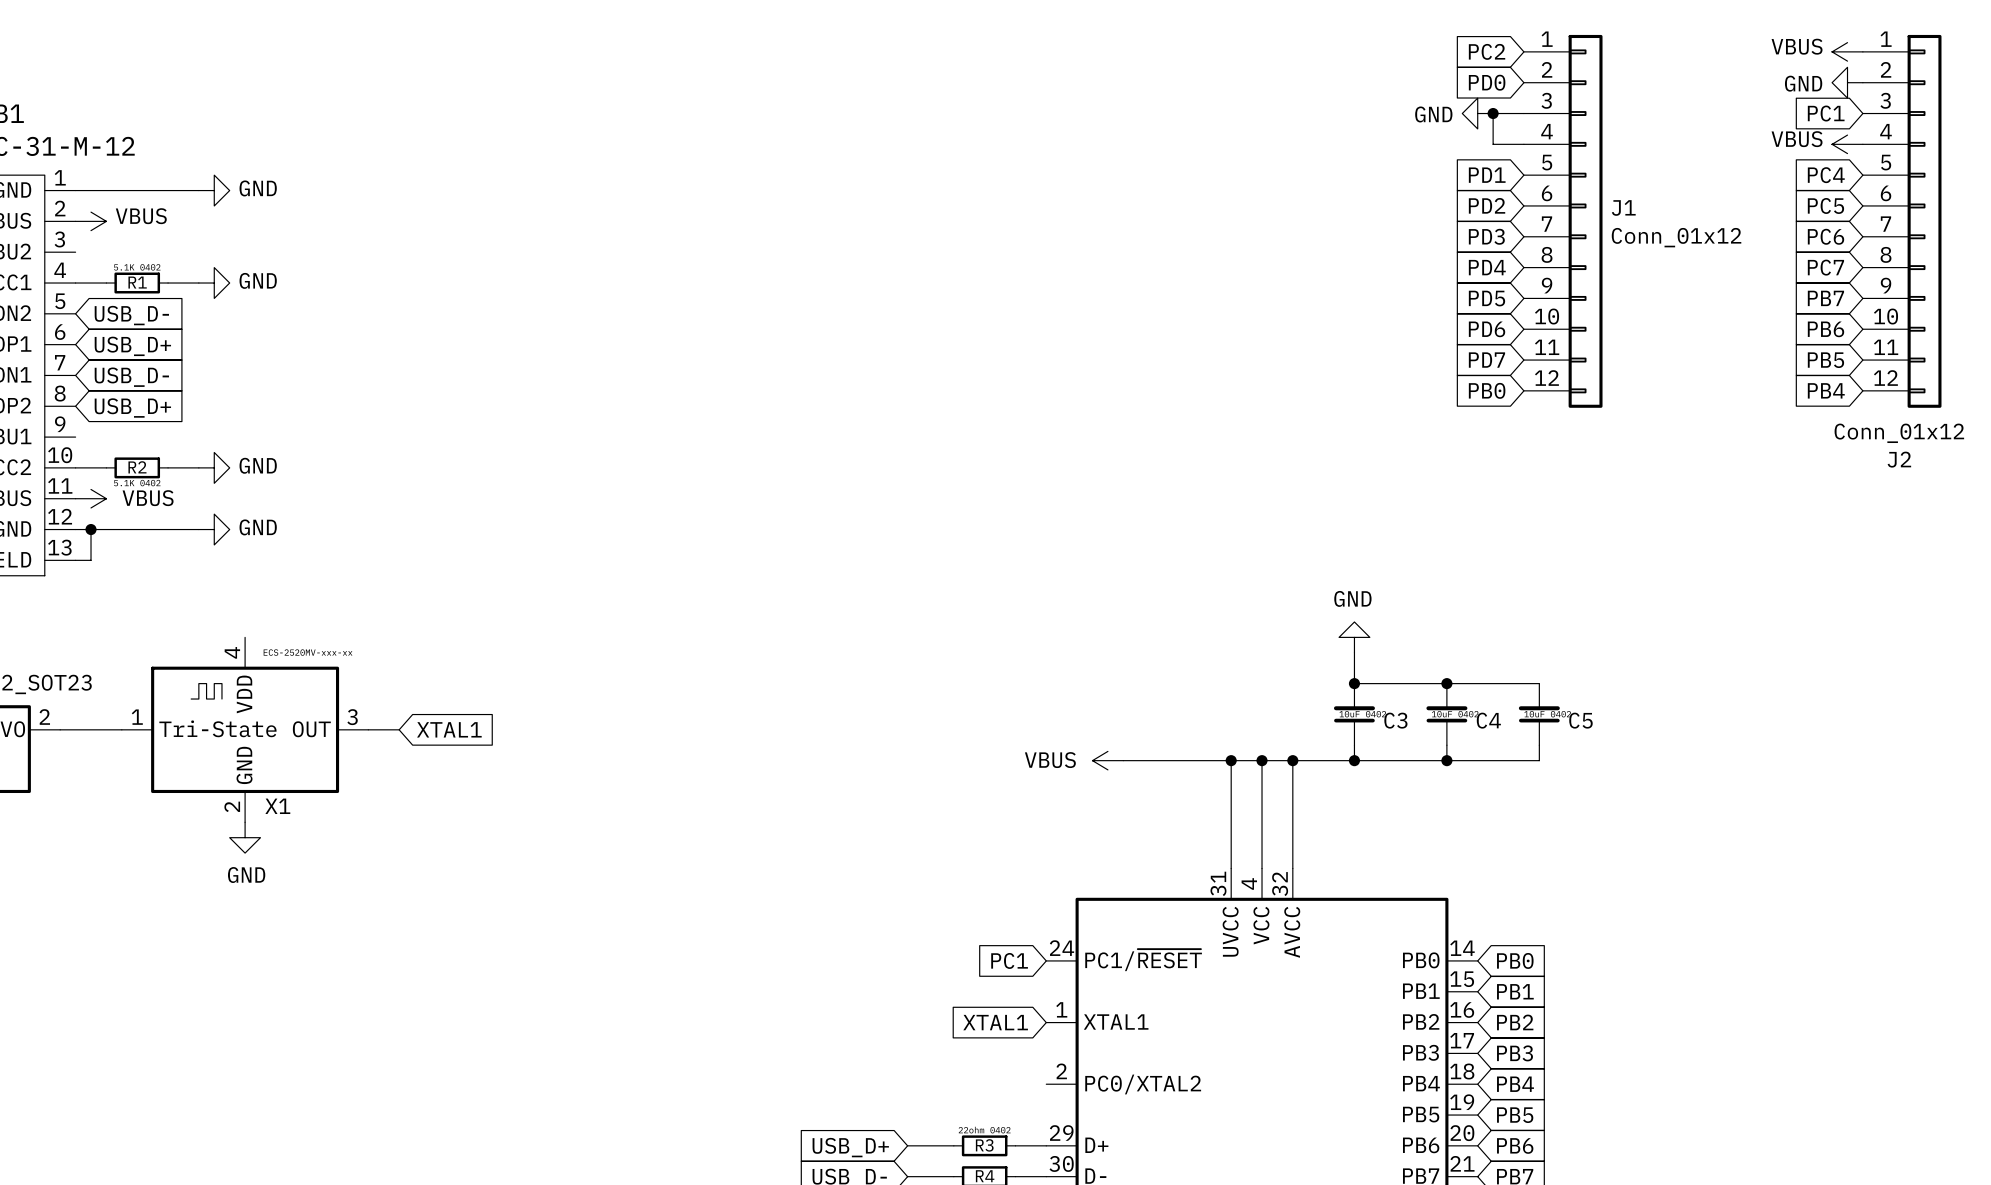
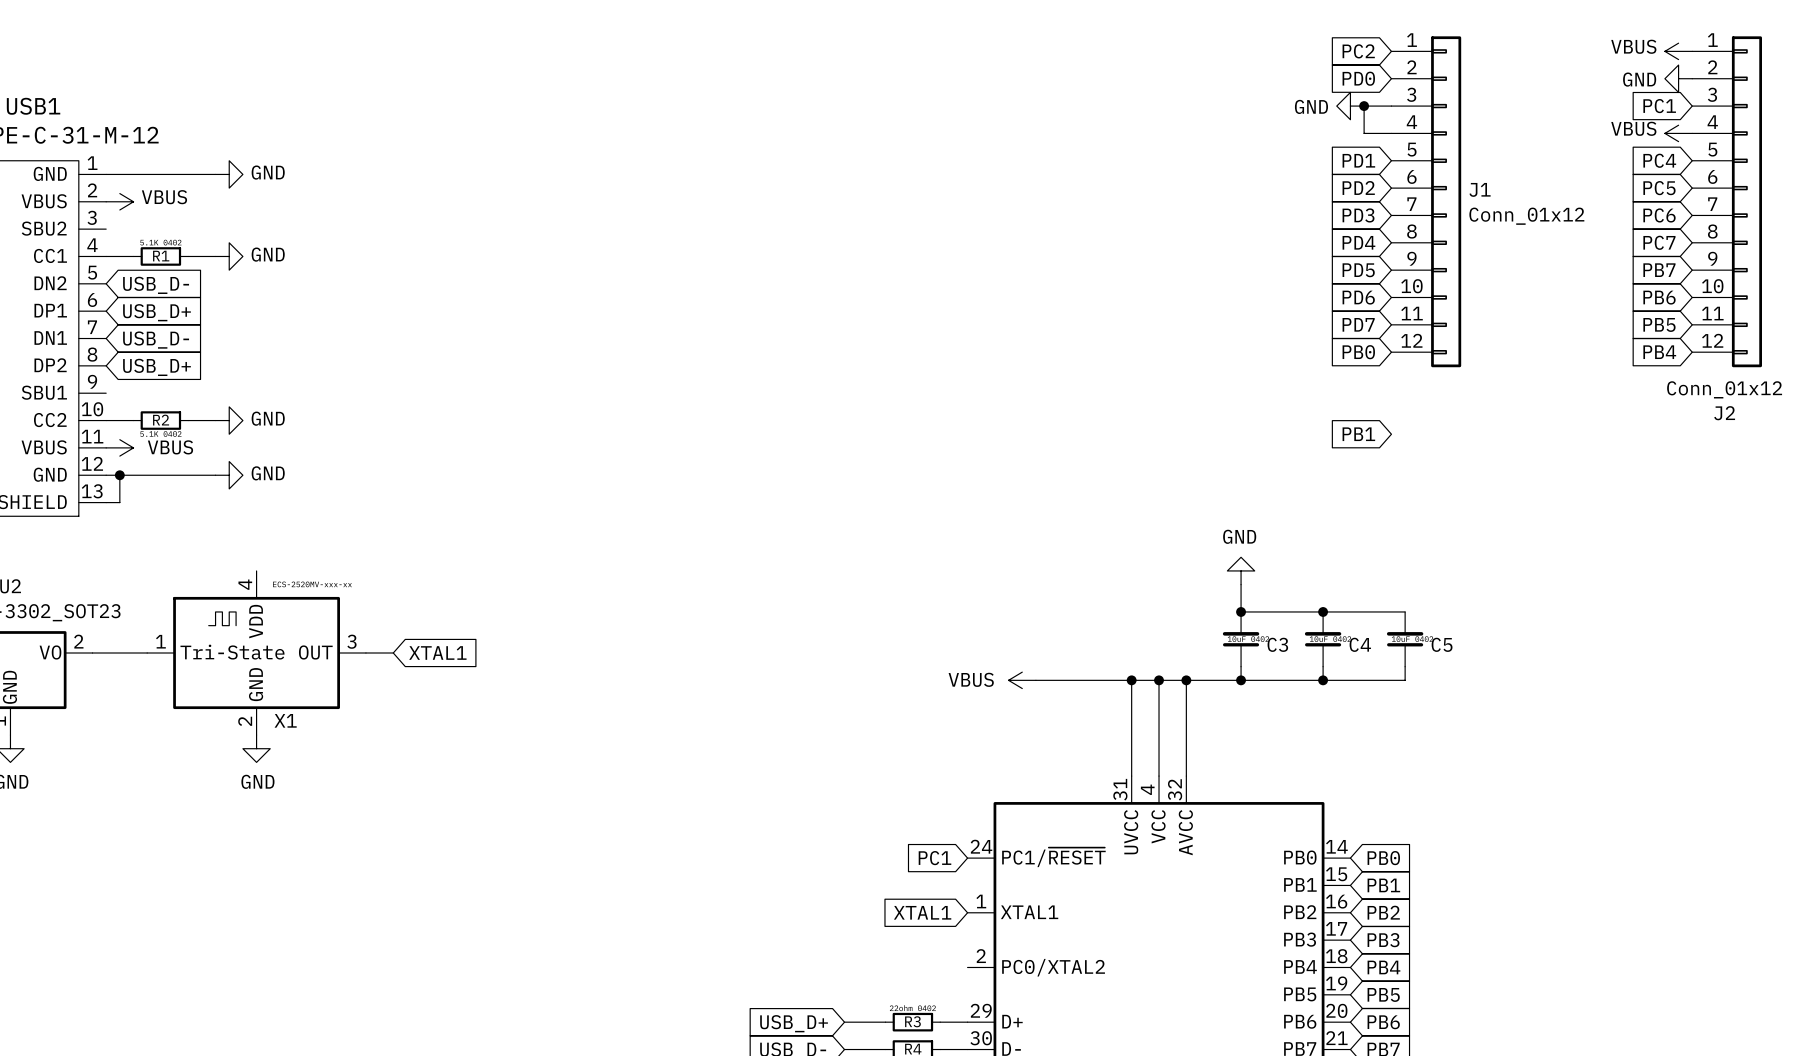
global label: none -> PB1 (1358, 434)

